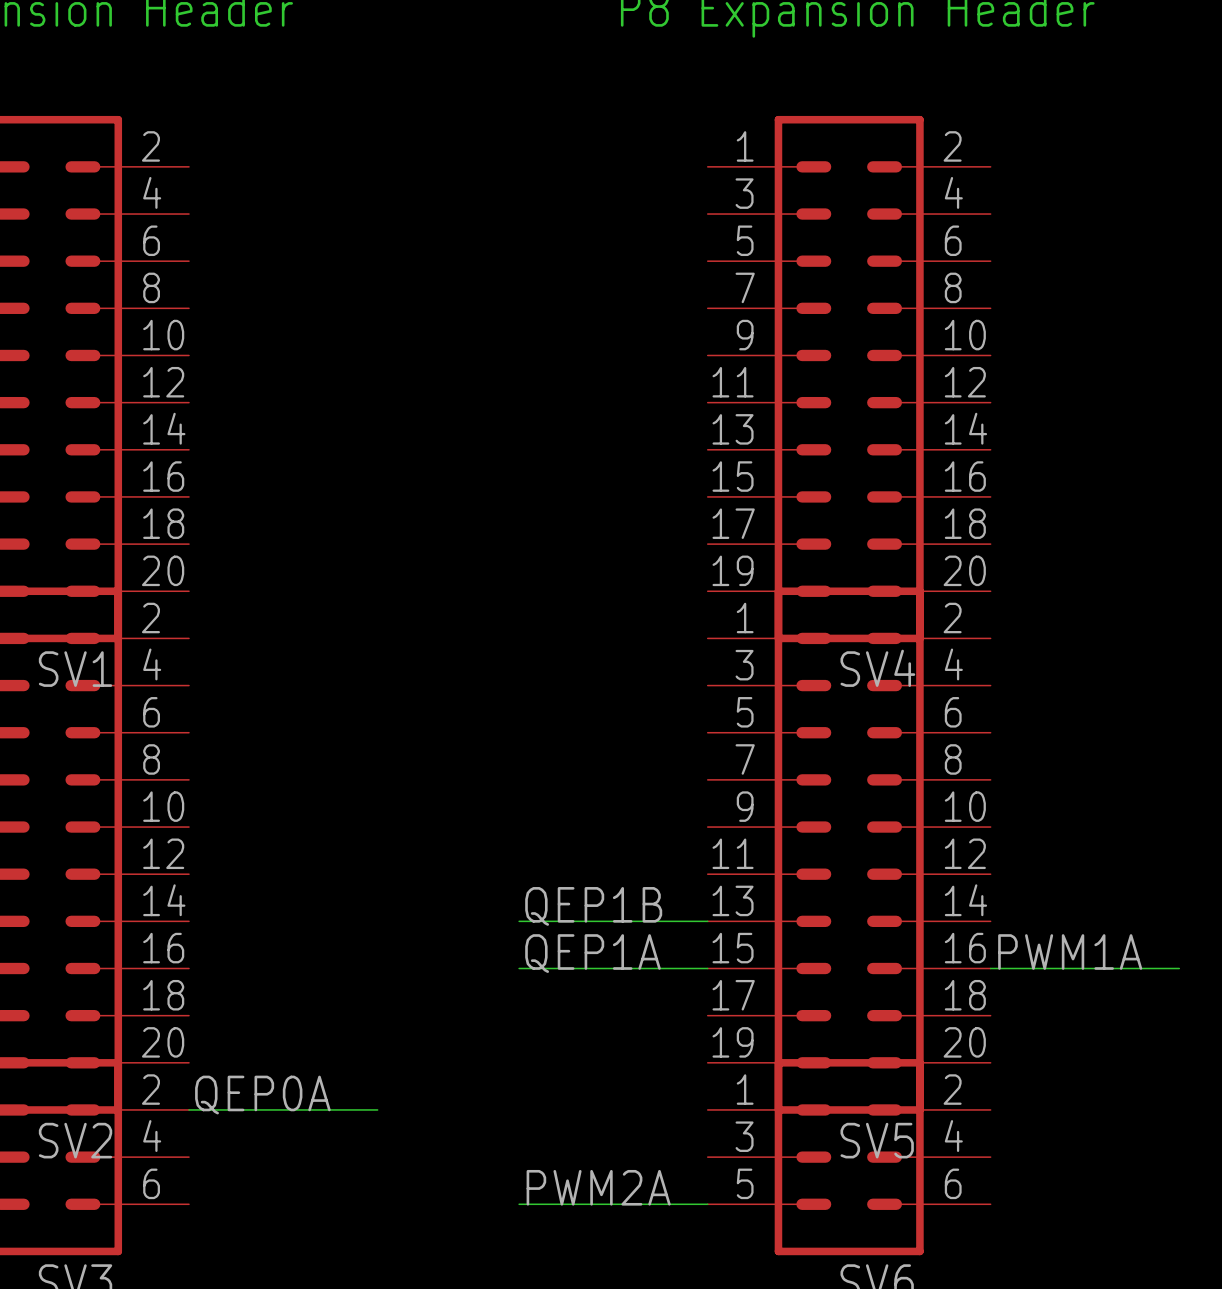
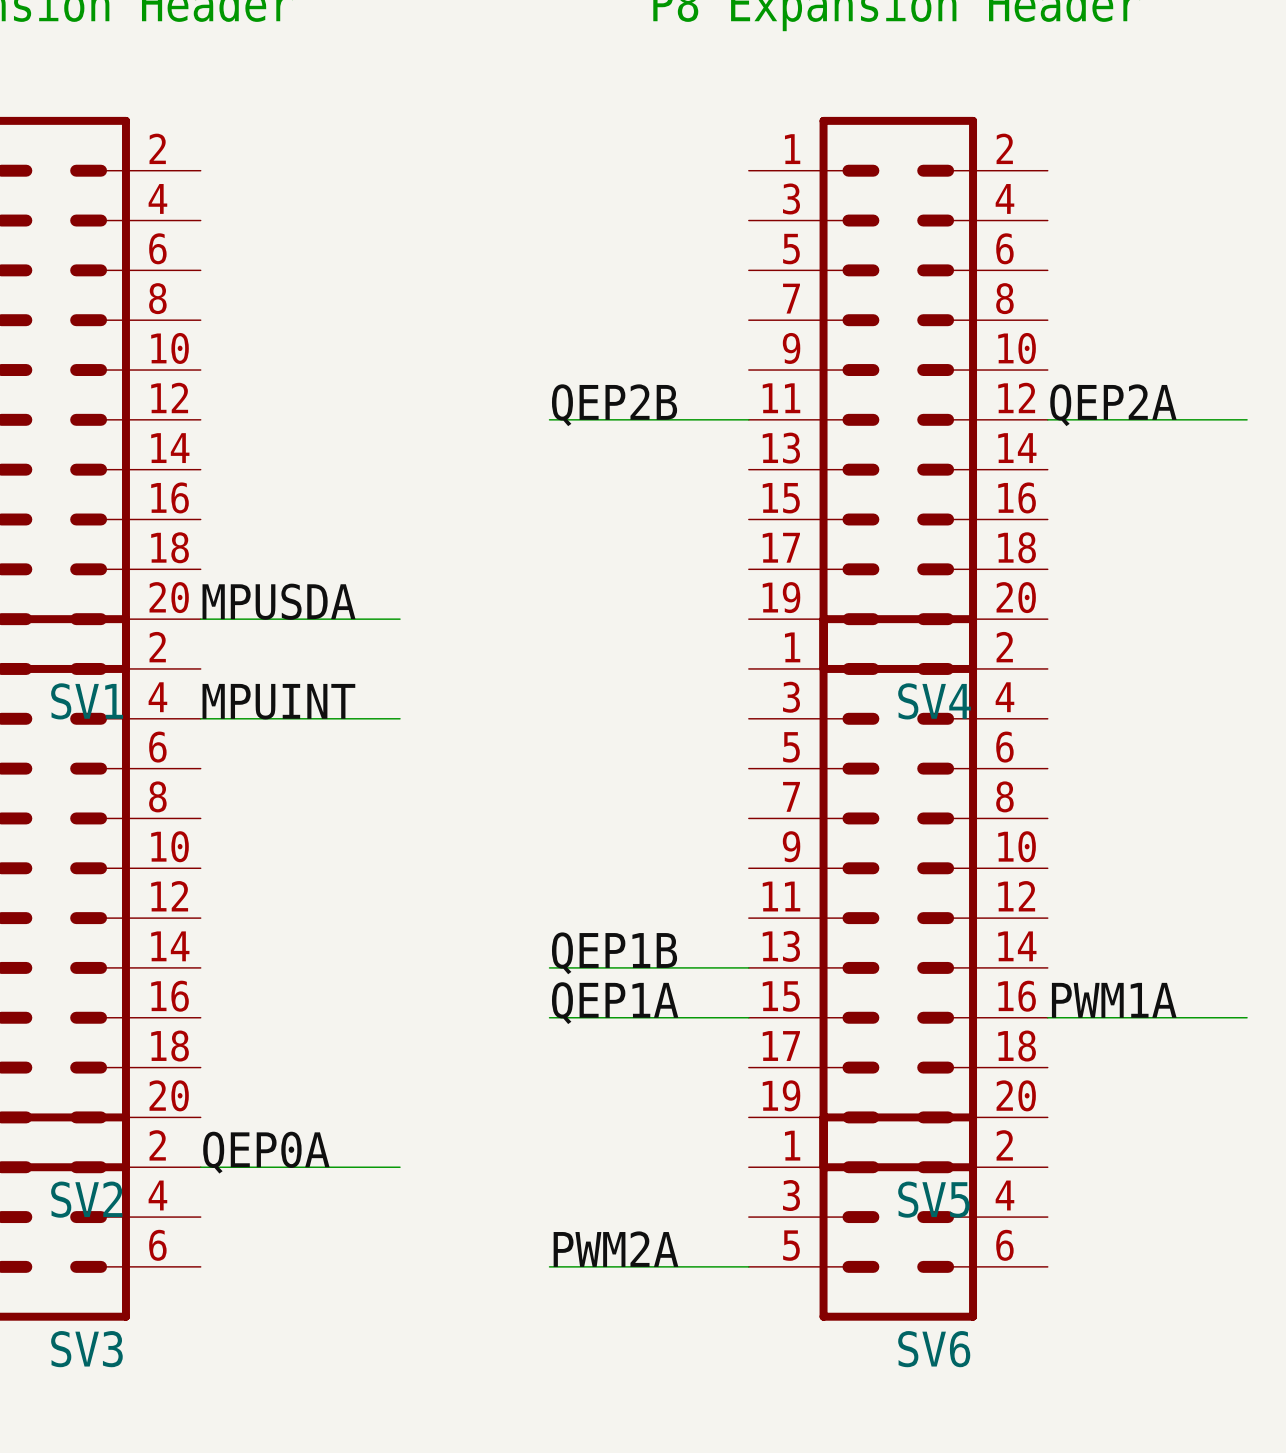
label: none -> QEP2B (614, 405)
label: none -> QEP2A (1113, 405)
wire: none -> (549, 419) (748, 419)
wire: none -> (1047, 419) (1247, 419)
label: none -> MPUSDA (279, 601)
wire: none -> (200, 619) (400, 619)
label: none -> MPUINT (278, 701)
wire: none -> (200, 718) (400, 718)

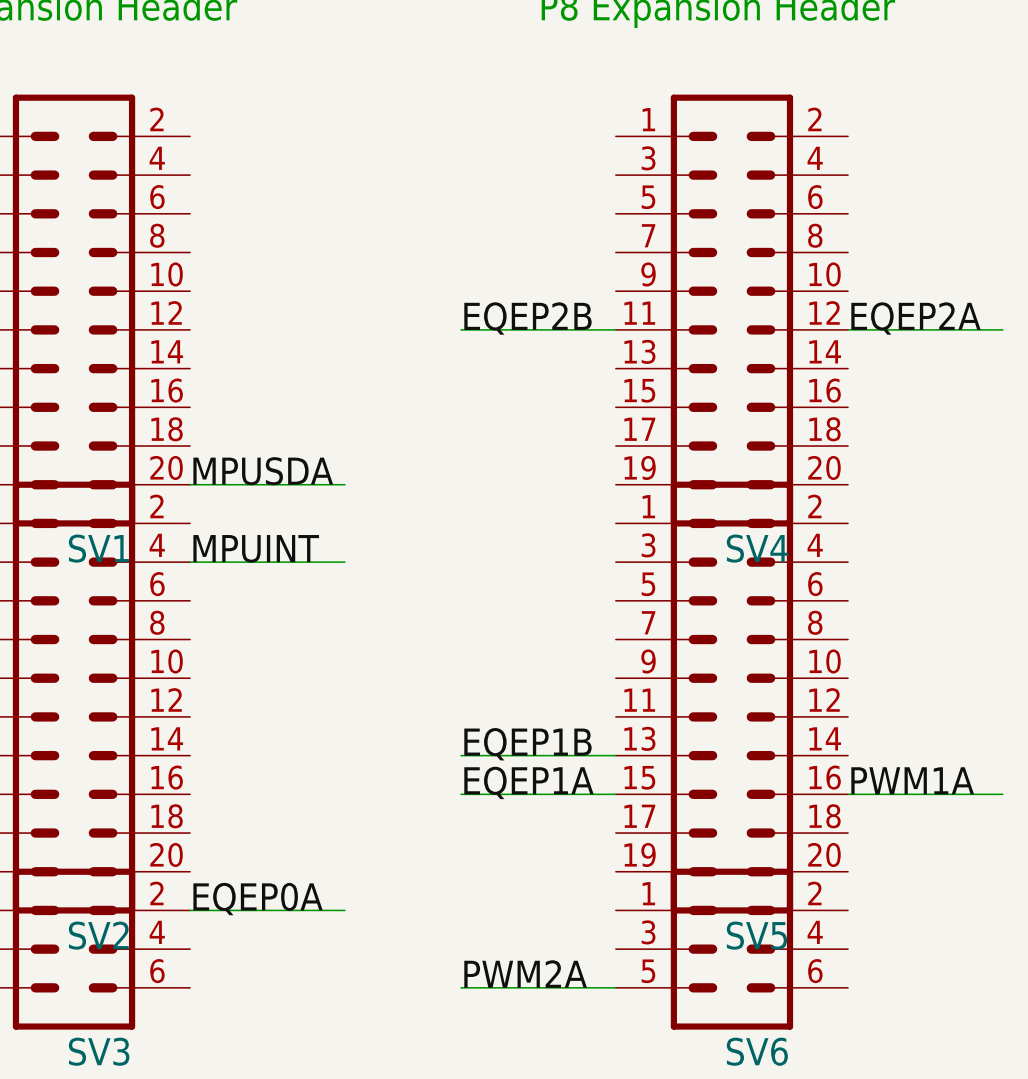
label: QEP2B (614, 405) -> EQEP2B (527, 318)
label: QEP2A (1113, 405) -> EQEP2A (916, 318)
label: QEP1B (614, 953) -> EQEP1B (527, 744)
label: QEP1A (615, 1003) -> EQEP1A (528, 782)
label: QEP0A (266, 1152) -> EQEP0A (258, 899)

